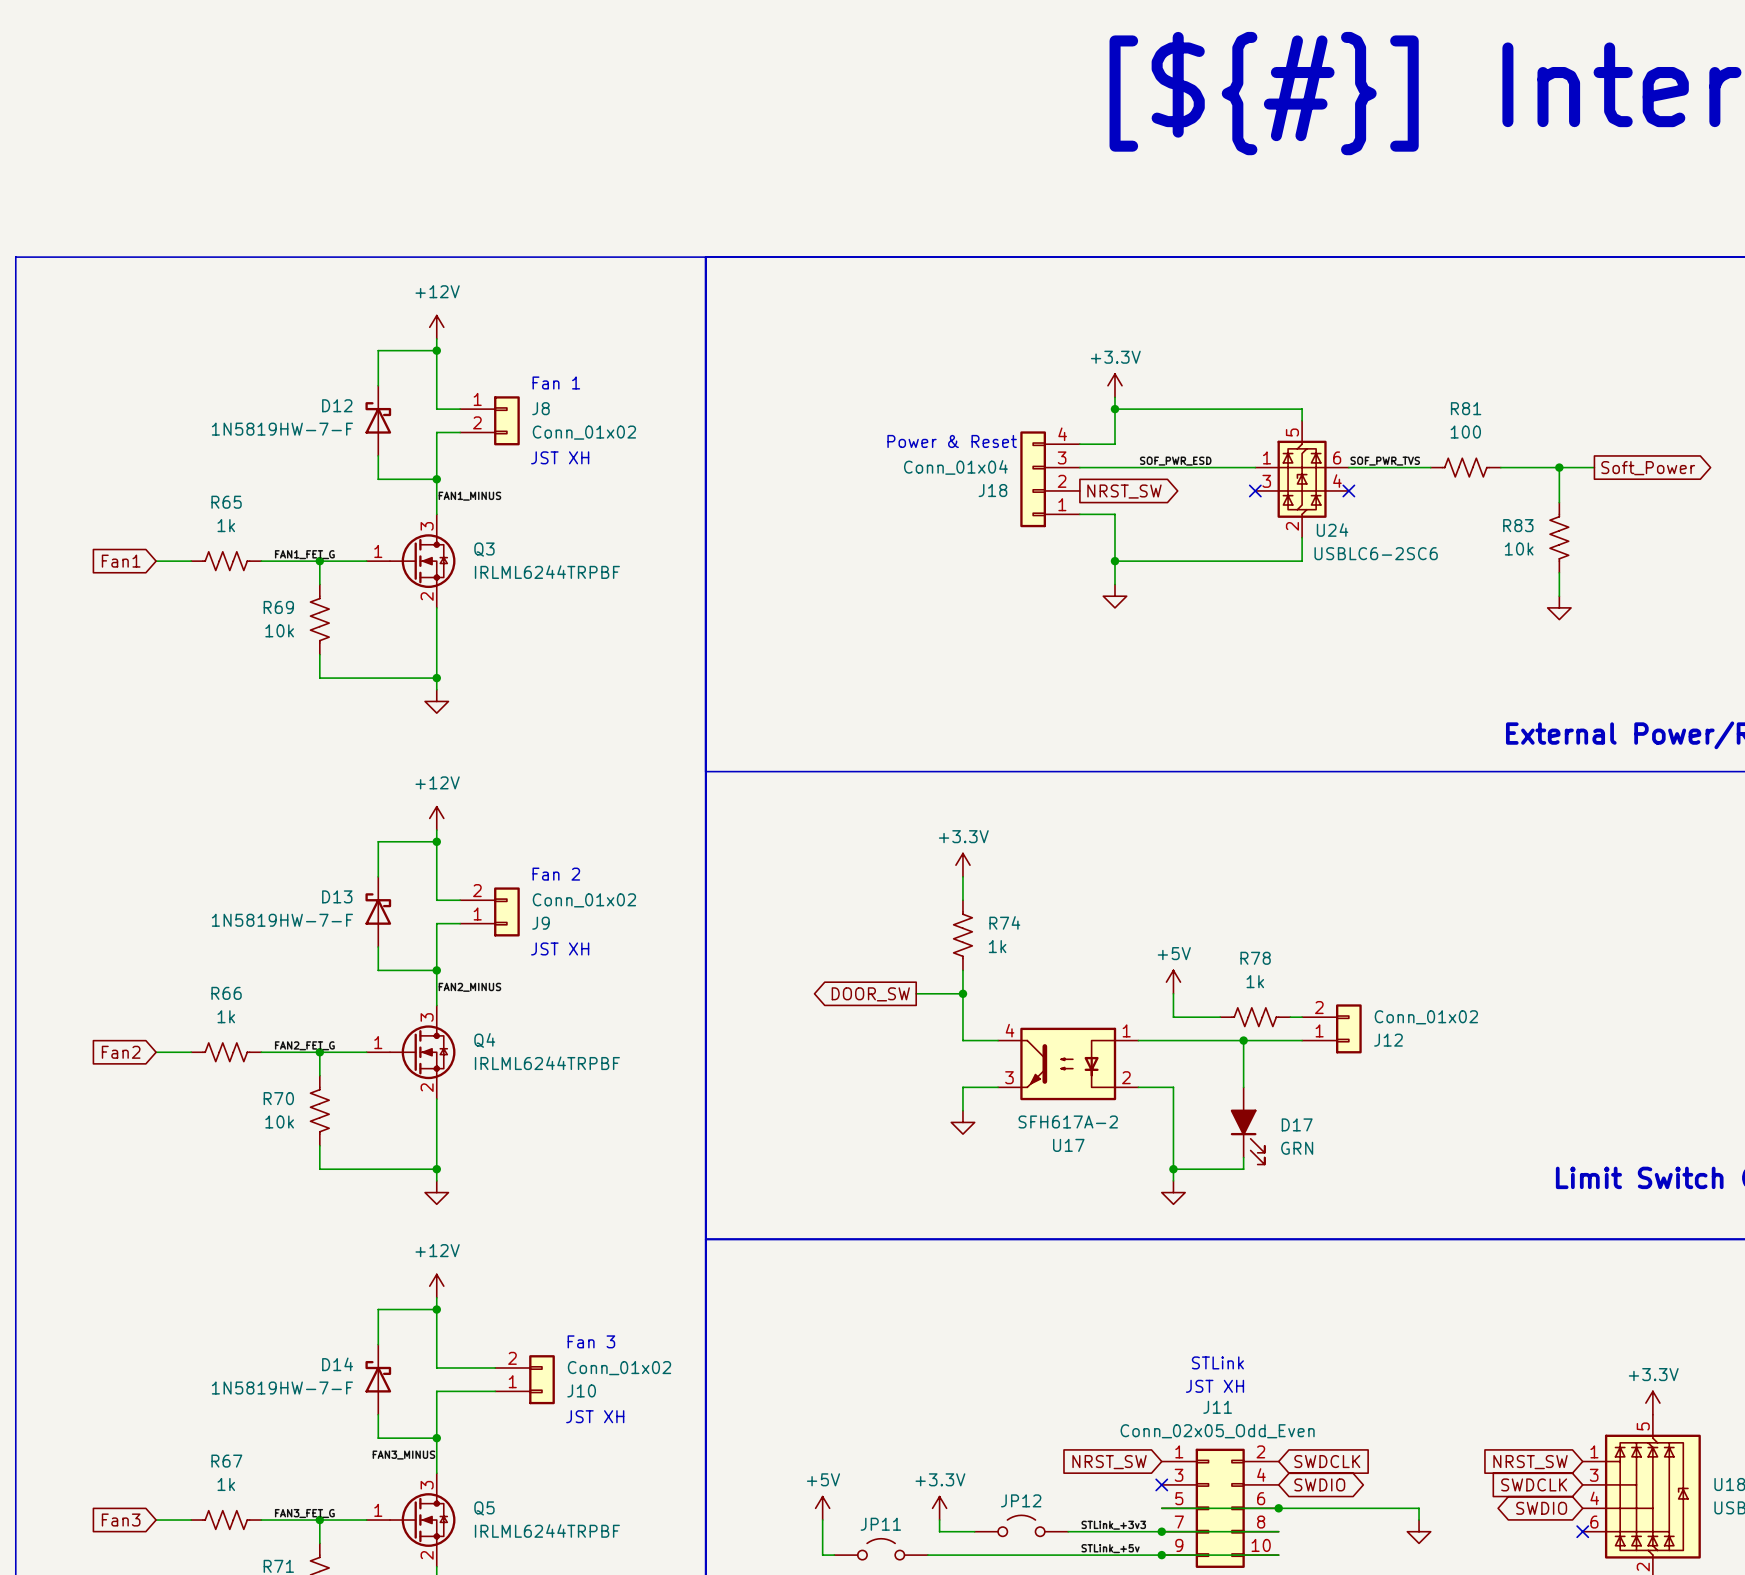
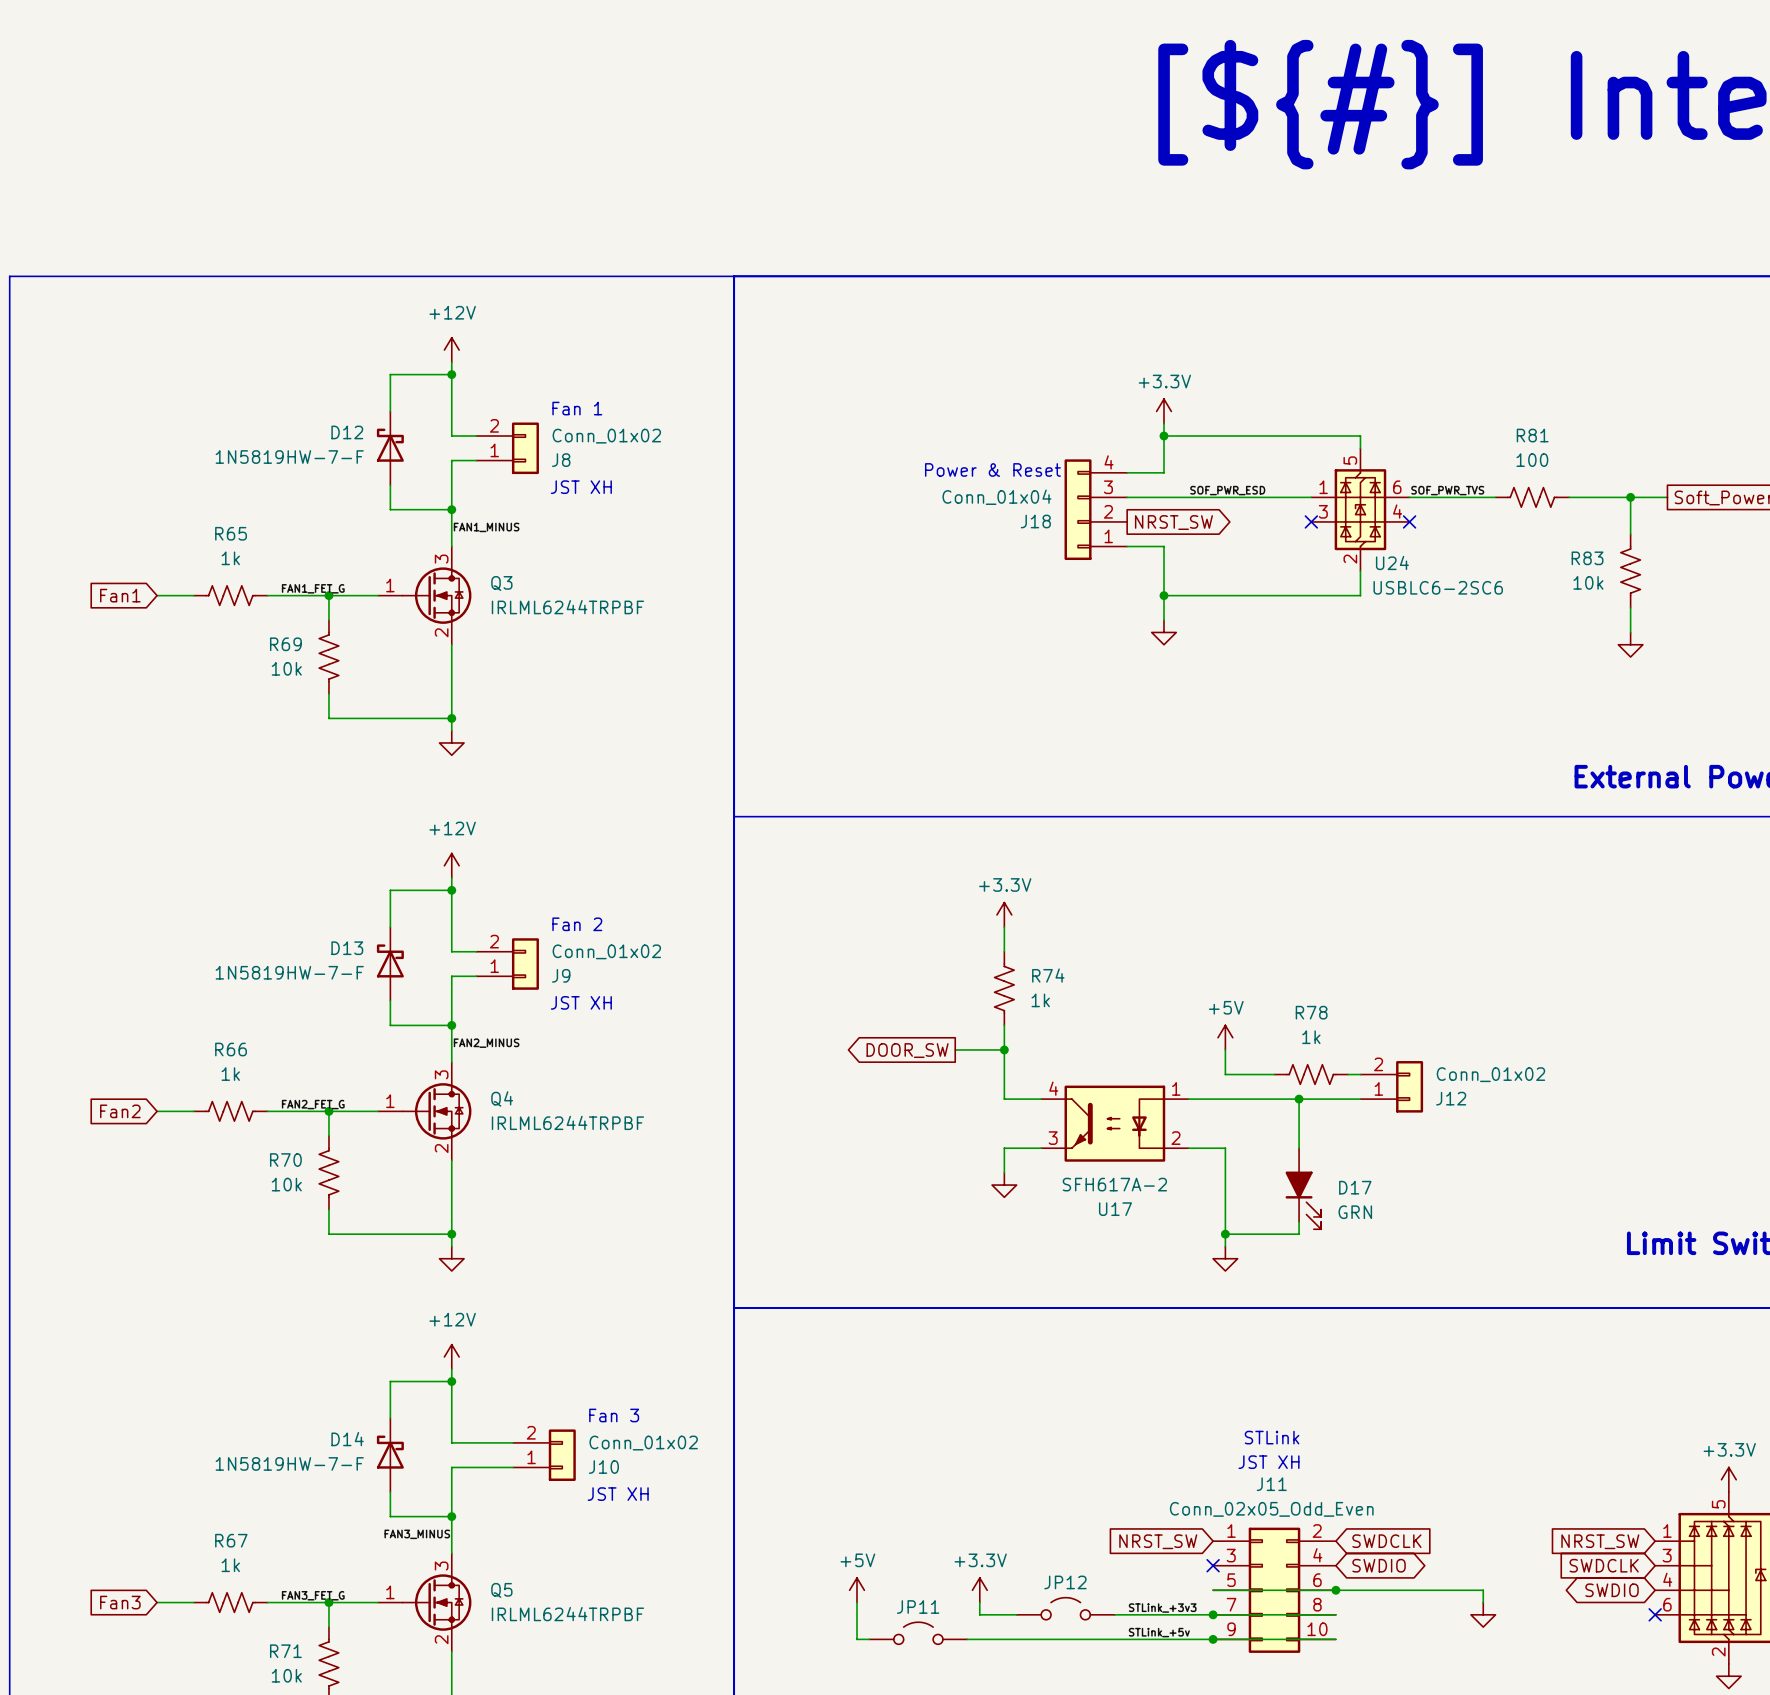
J8 flip: as is (506, 420) -> up-down (525, 448)

